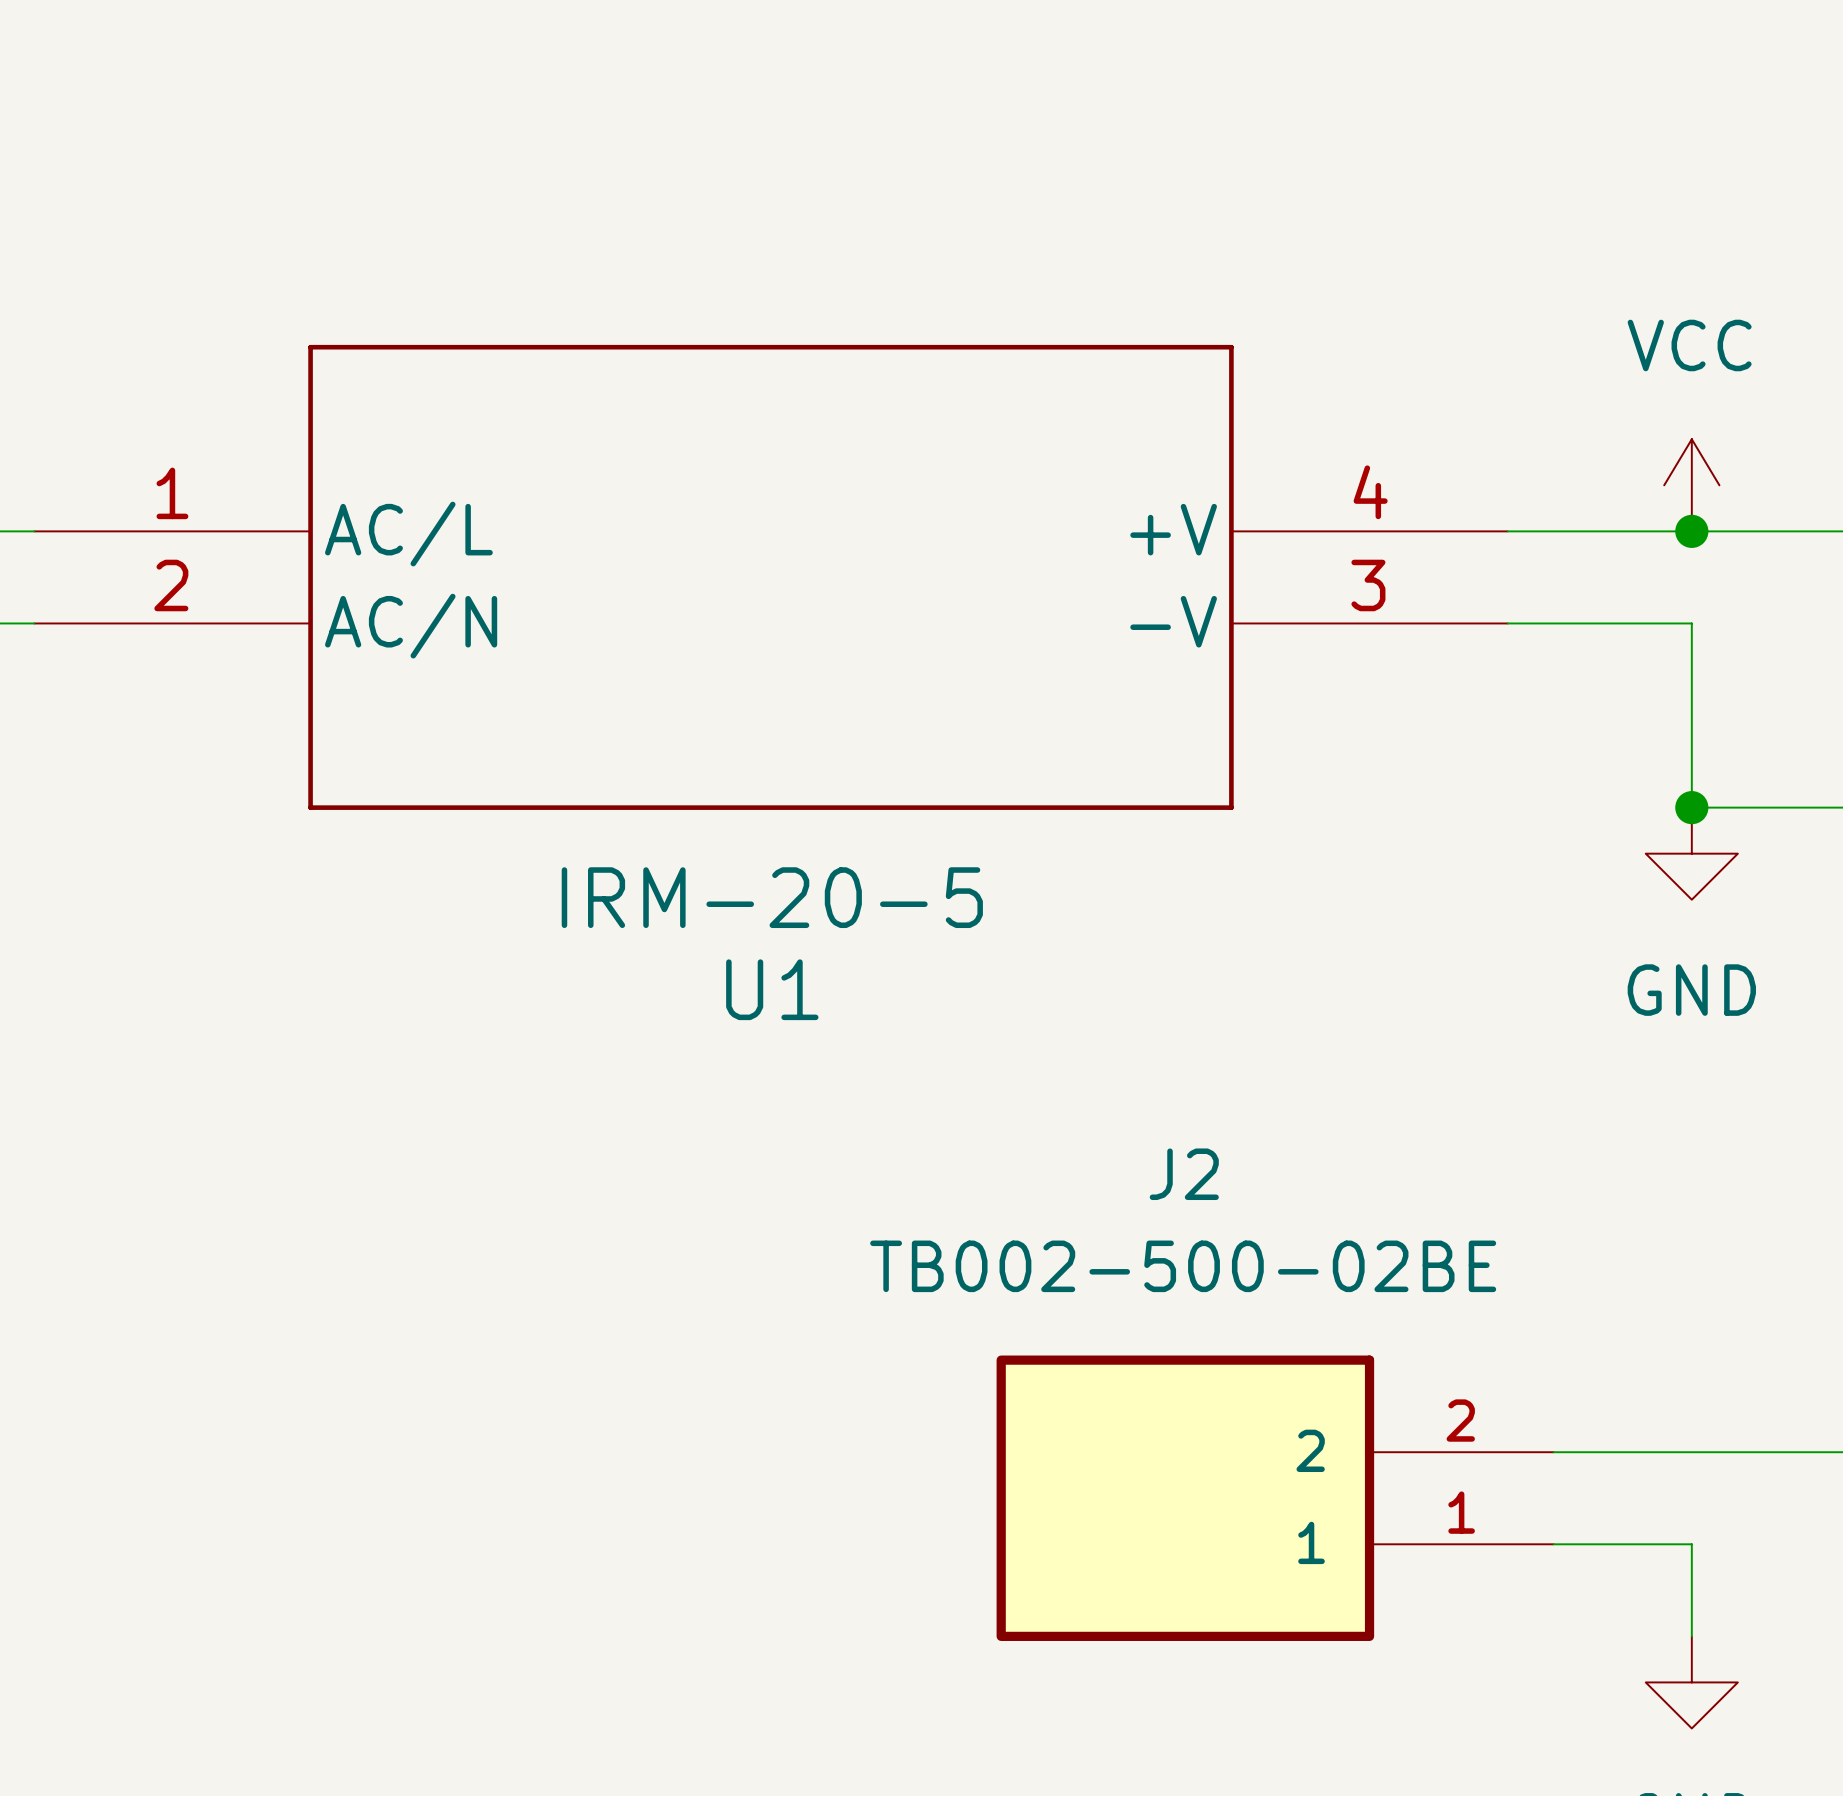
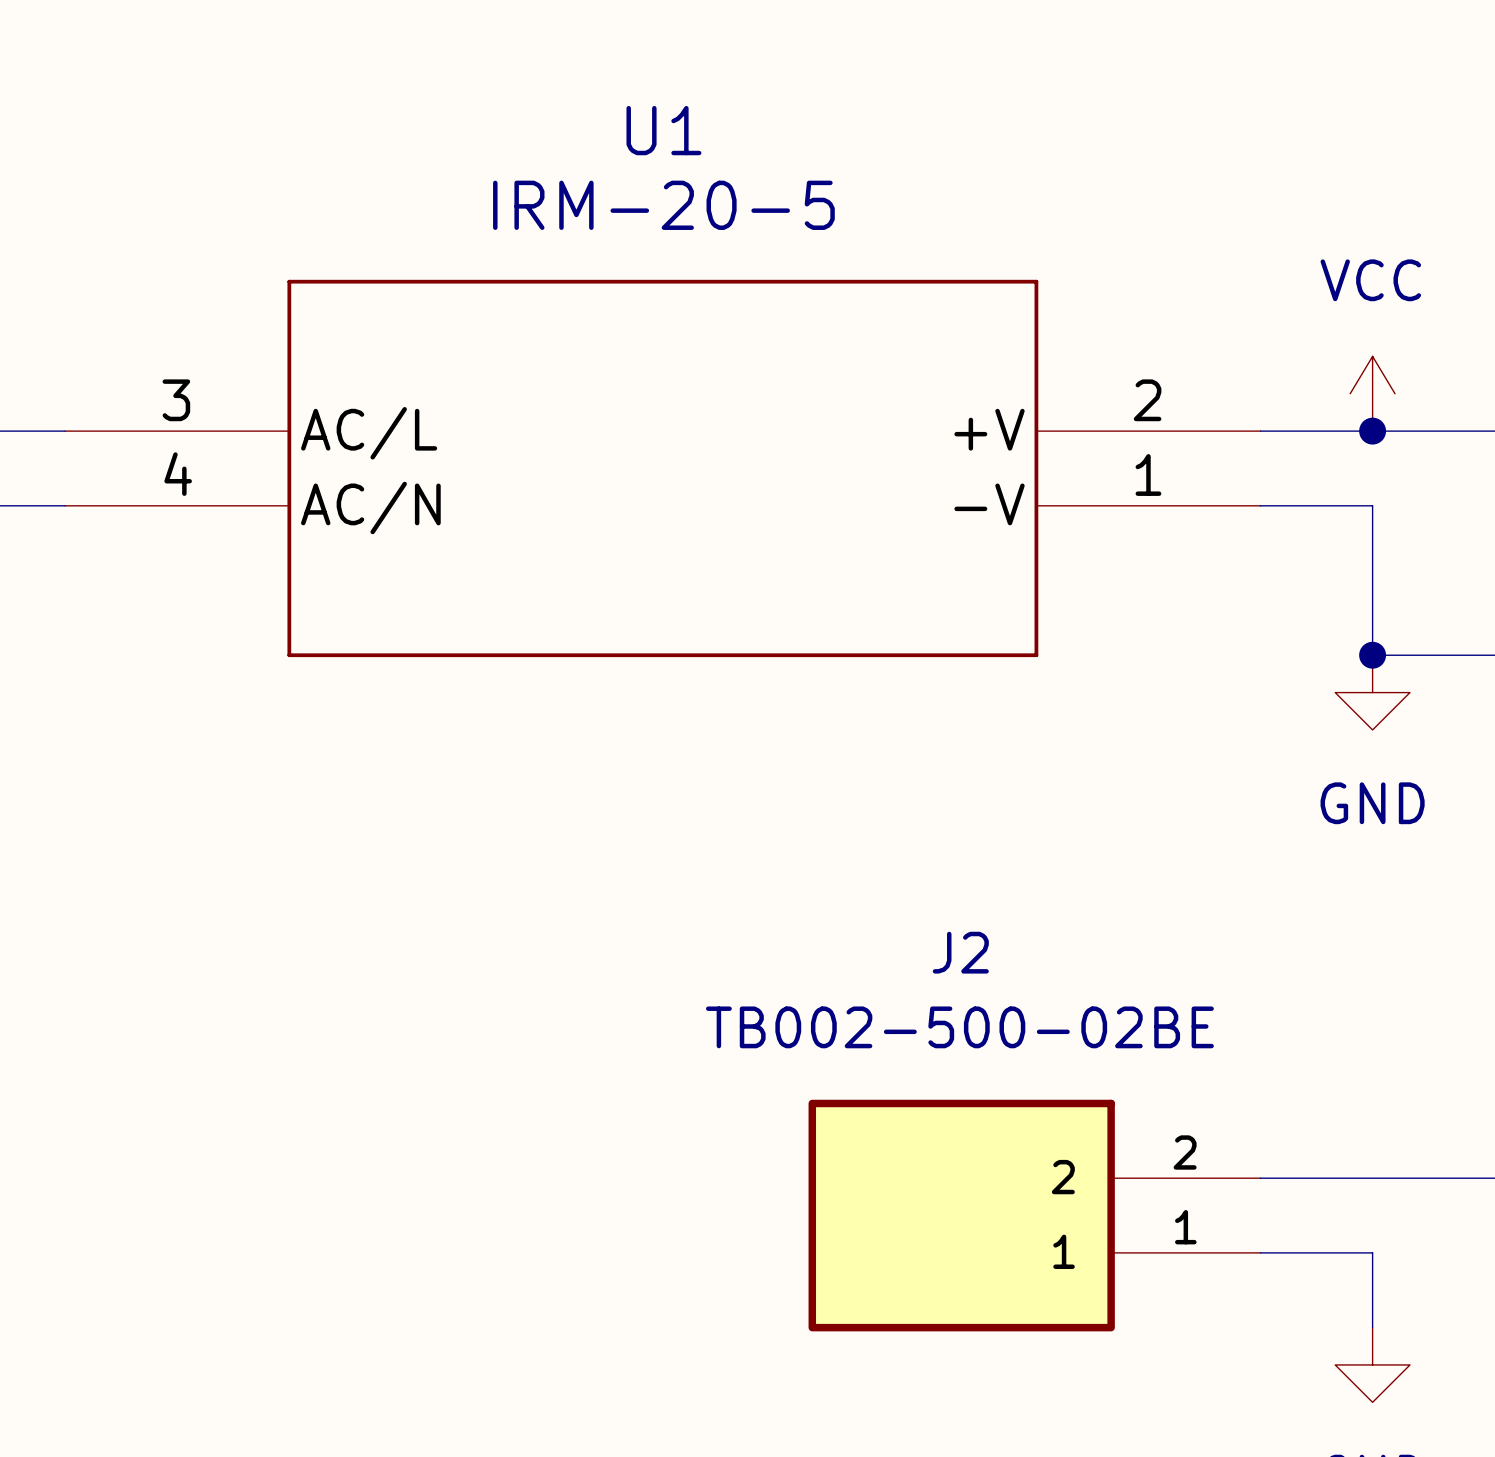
U1 pin number: 4 (1370, 492) -> 2 (1147, 400)
U1 pin number: 1 (172, 493) -> 3 (176, 400)
U1 position: (770, 577) -> (662, 468)
U1 pin number: 2 (171, 585) -> 4 (178, 474)
U1 pin number: 3 (1368, 585) -> 1 (1148, 475)
U1 value position: IRM-20-5 (772, 897) -> IRM-20-5 (663, 205)
U1 name position: U1 (772, 989) -> U1 (663, 130)

